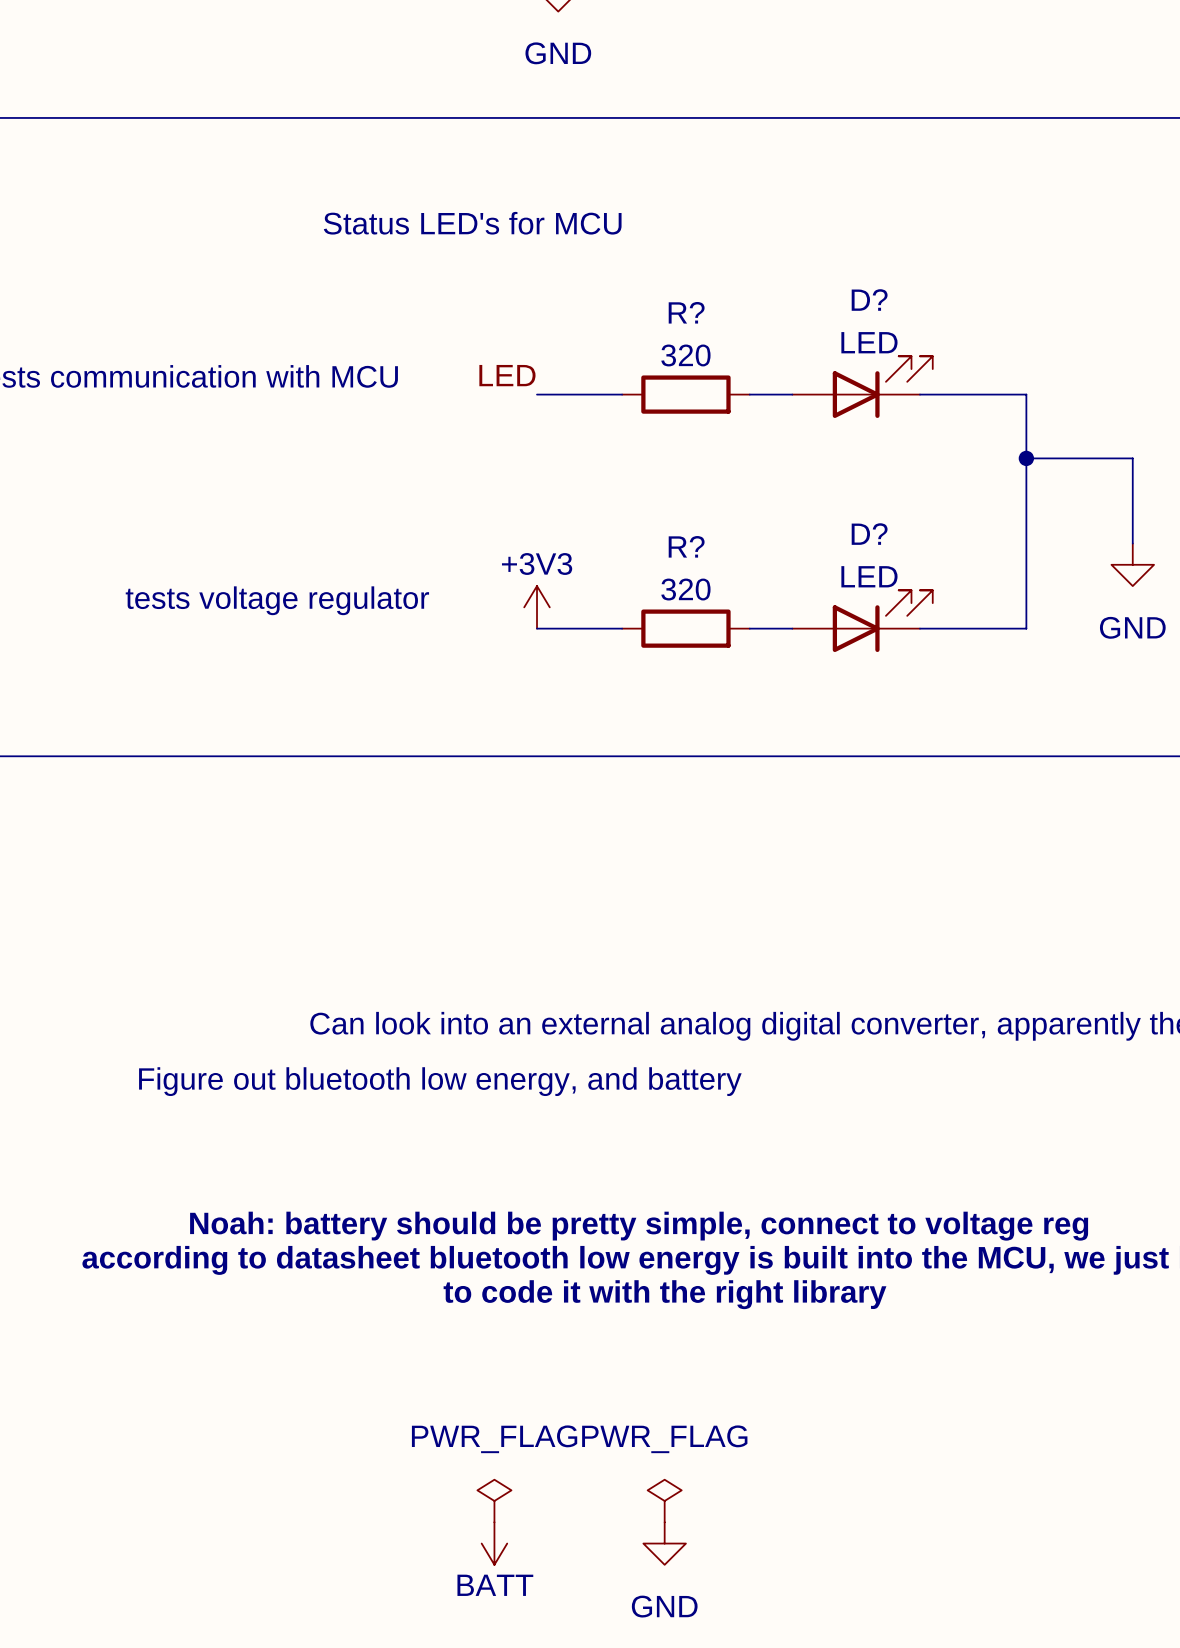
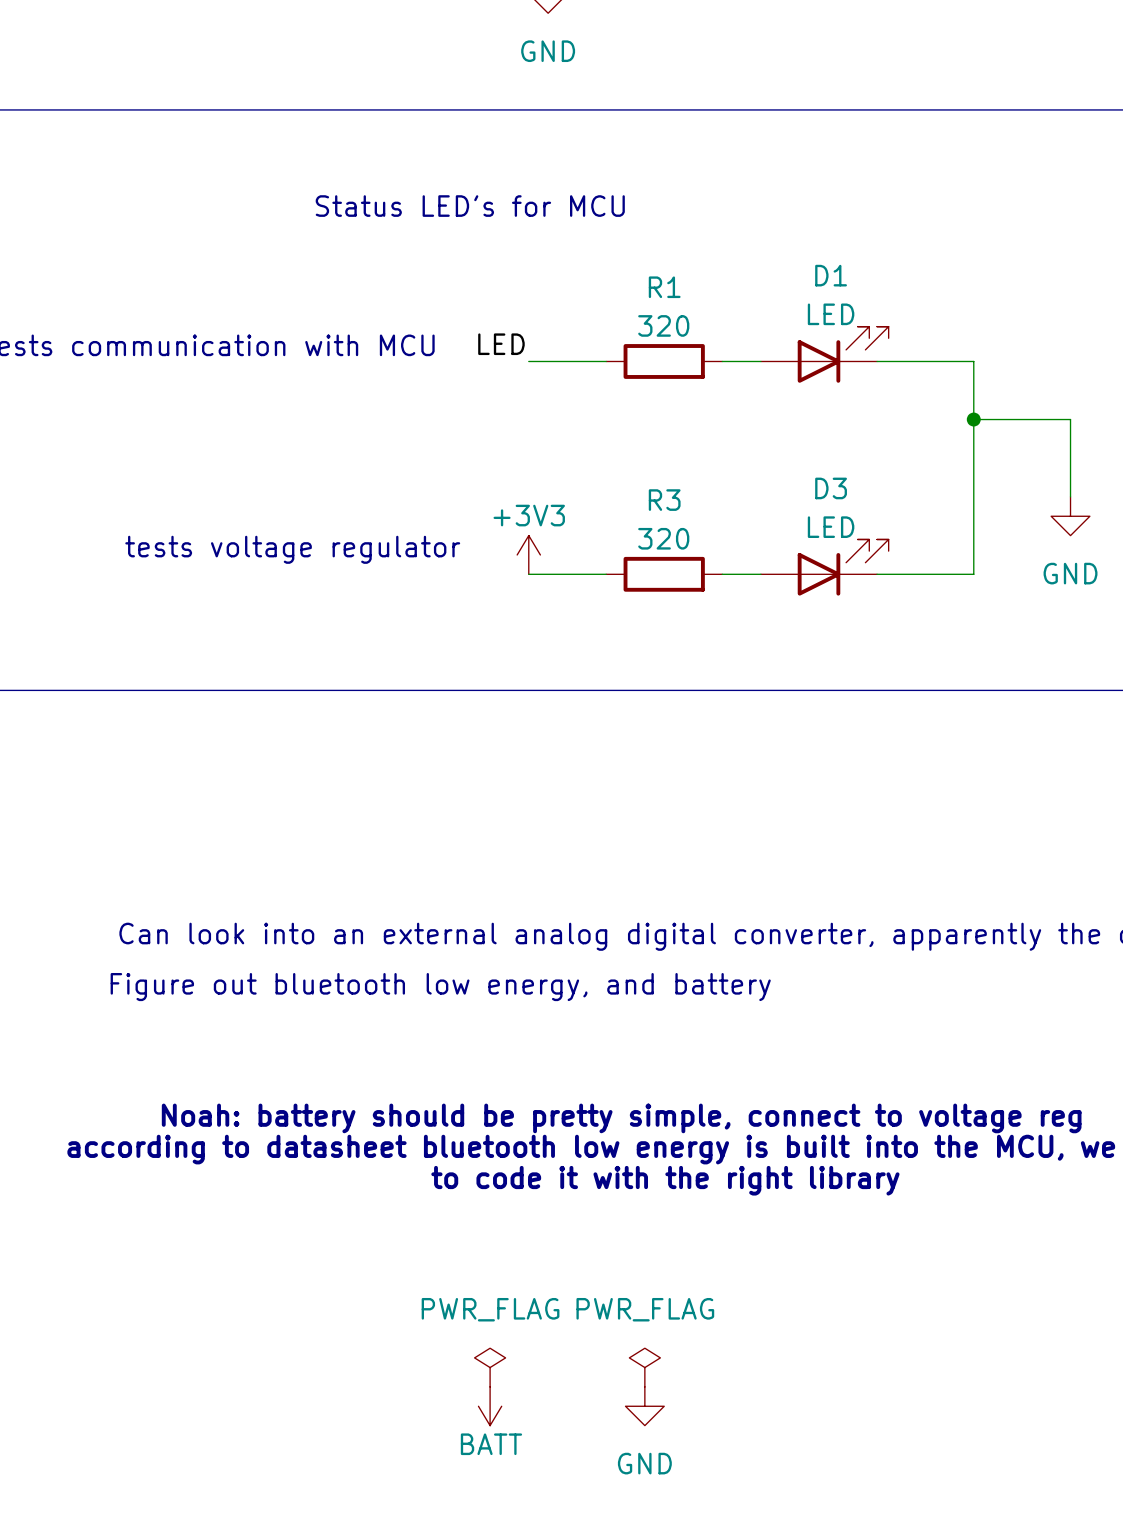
D? name: D? (869, 300) -> D1 (831, 275)
R? name: R? (686, 312) -> R1 (664, 287)
D? name: D? (869, 534) -> D3 (831, 488)
R? name: R? (686, 546) -> R3 (664, 500)

